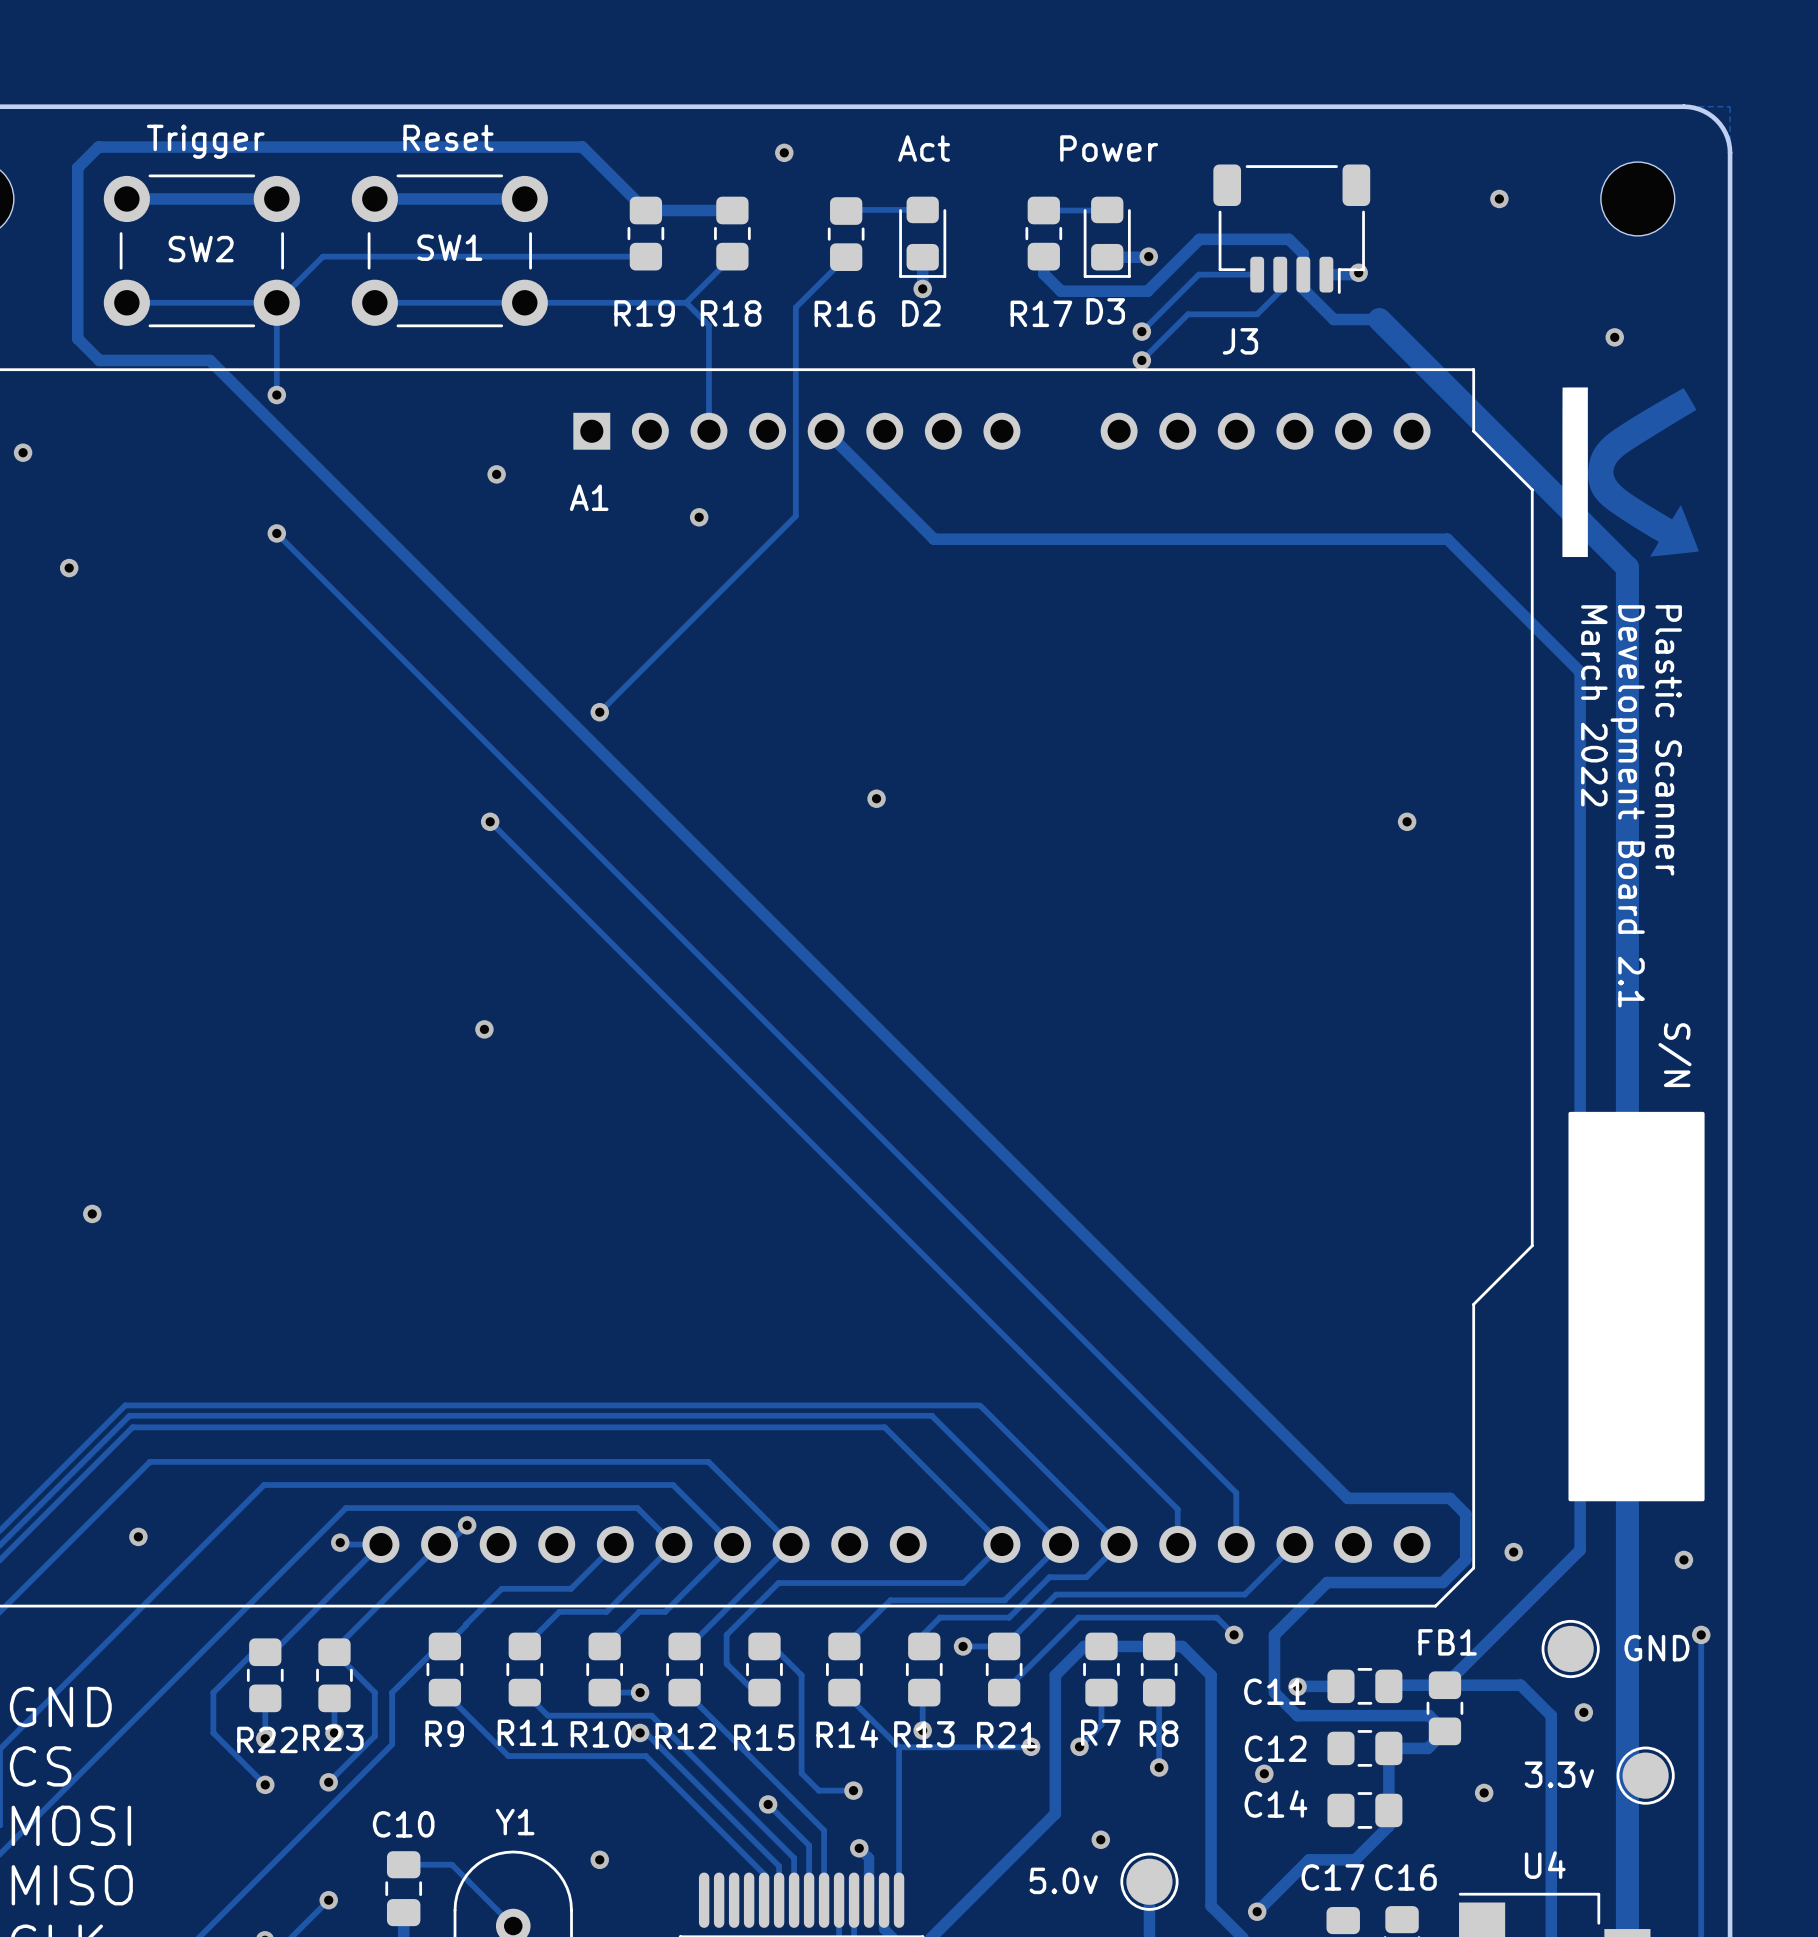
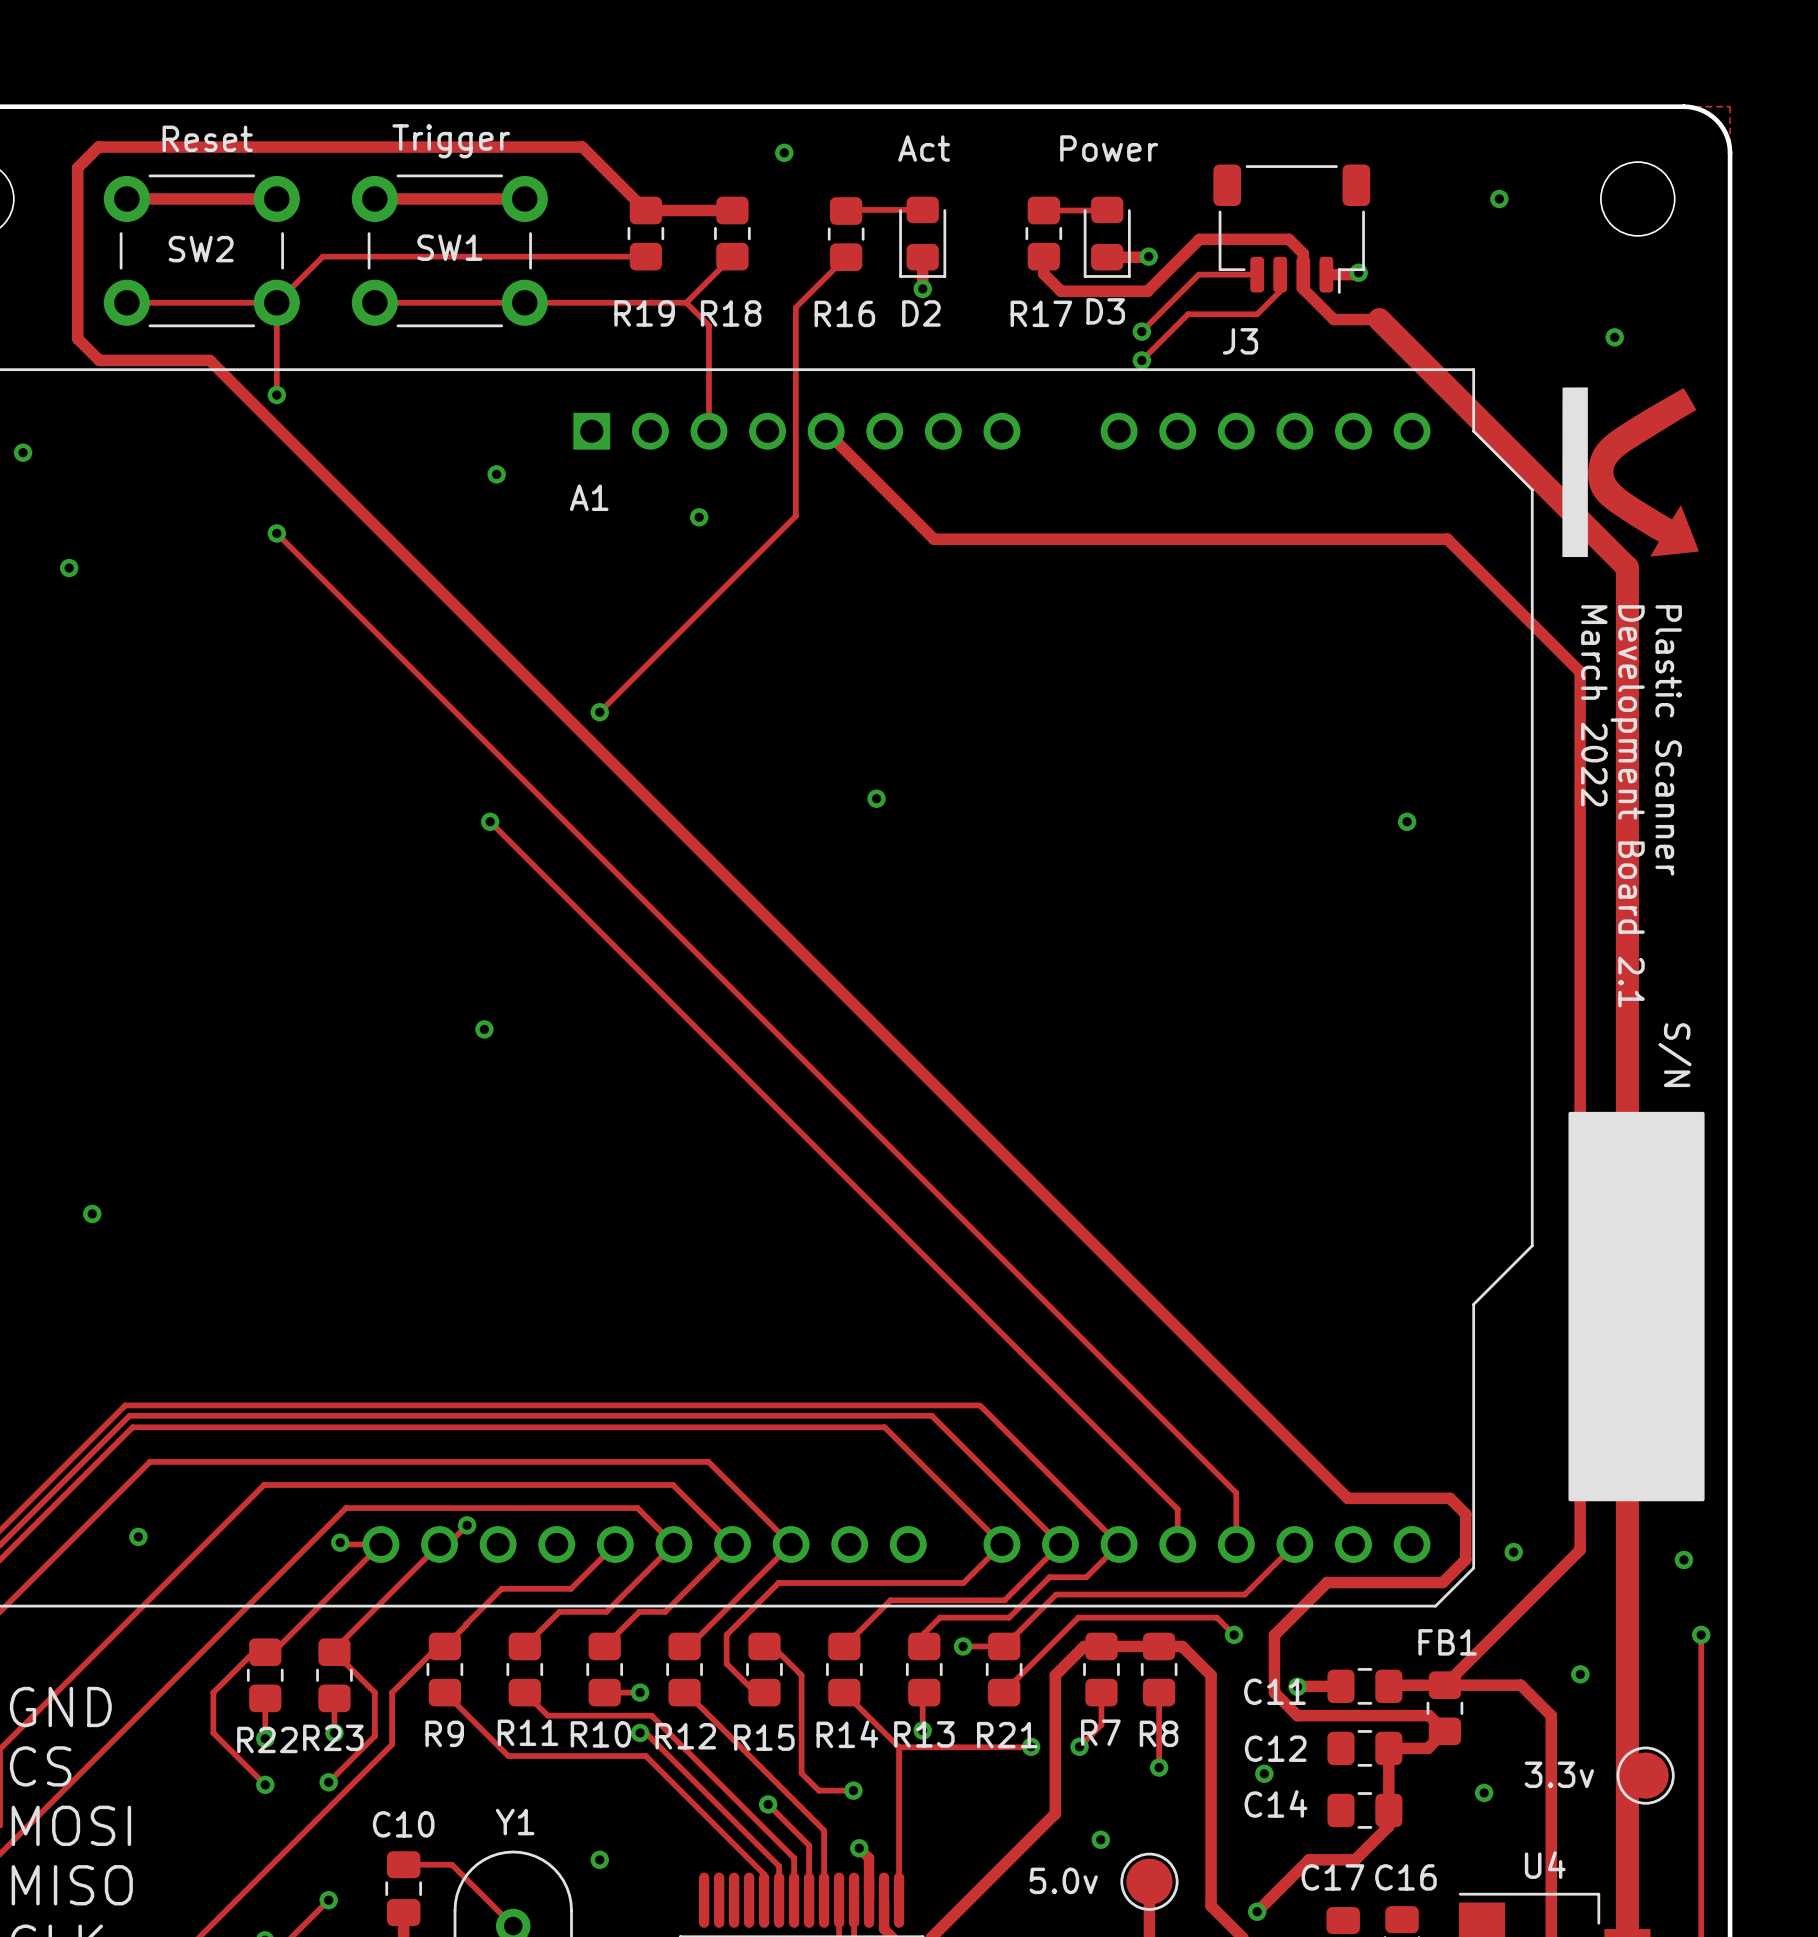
text: Reset (448, 137) -> Trigger (451, 141)
text: Trigger (205, 141) -> Reset (207, 138)
GND: (1570, 1649) -> none
via position: (1583, 1712) -> (1580, 1674)

